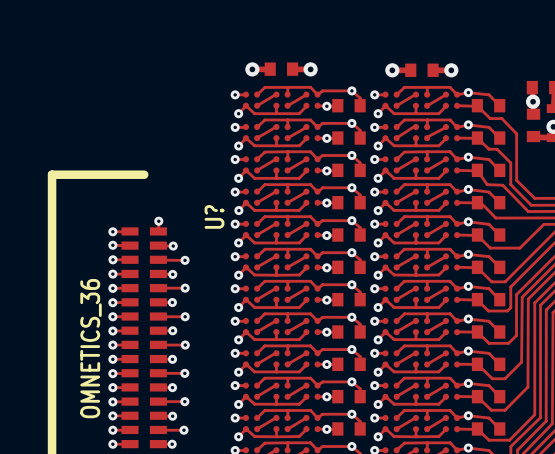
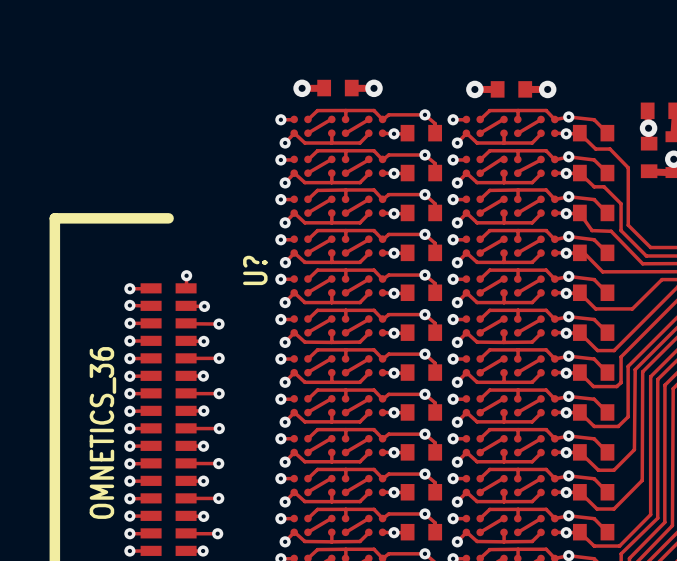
via: none -> (566, 133)
via: none -> (566, 173)
via: none -> (566, 213)
via: none -> (566, 253)
via: none -> (566, 293)
via: none -> (566, 333)
via: none -> (566, 373)
via: none -> (566, 412)
via: none -> (566, 452)
via: none -> (566, 492)
via: none -> (566, 532)

